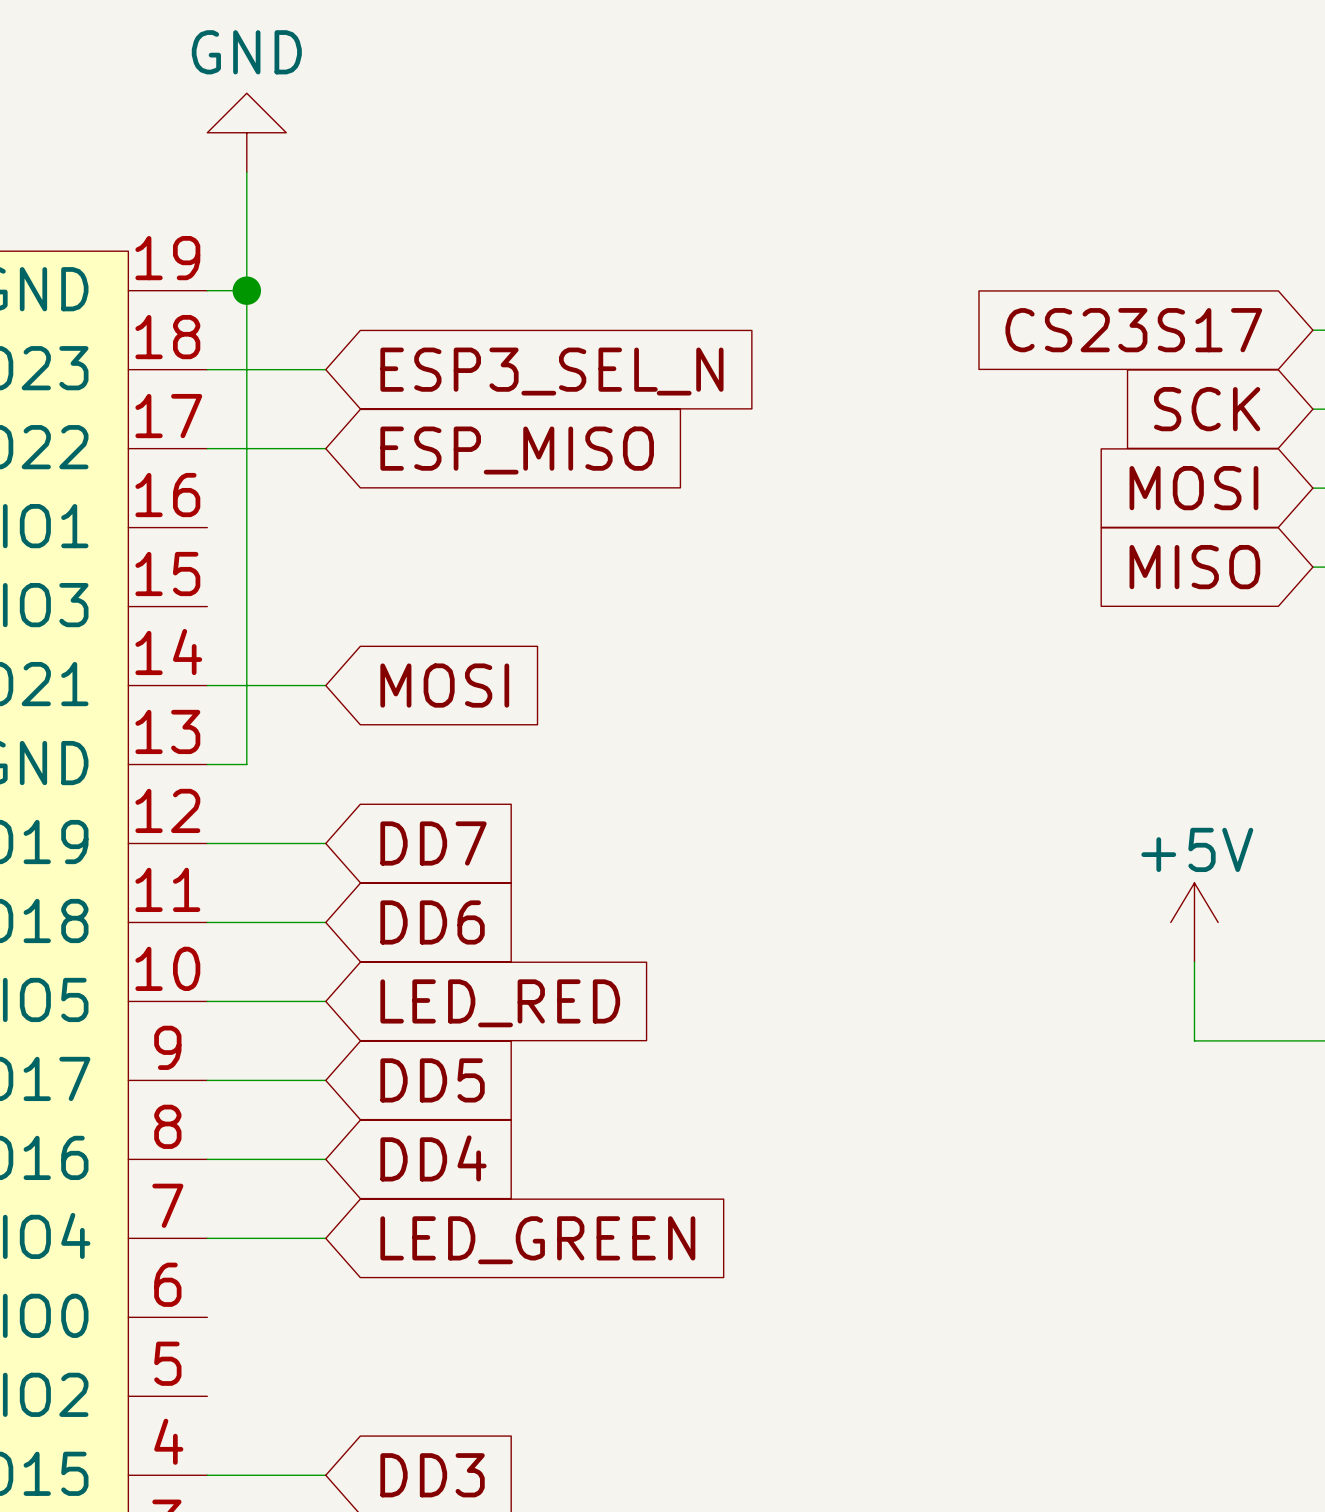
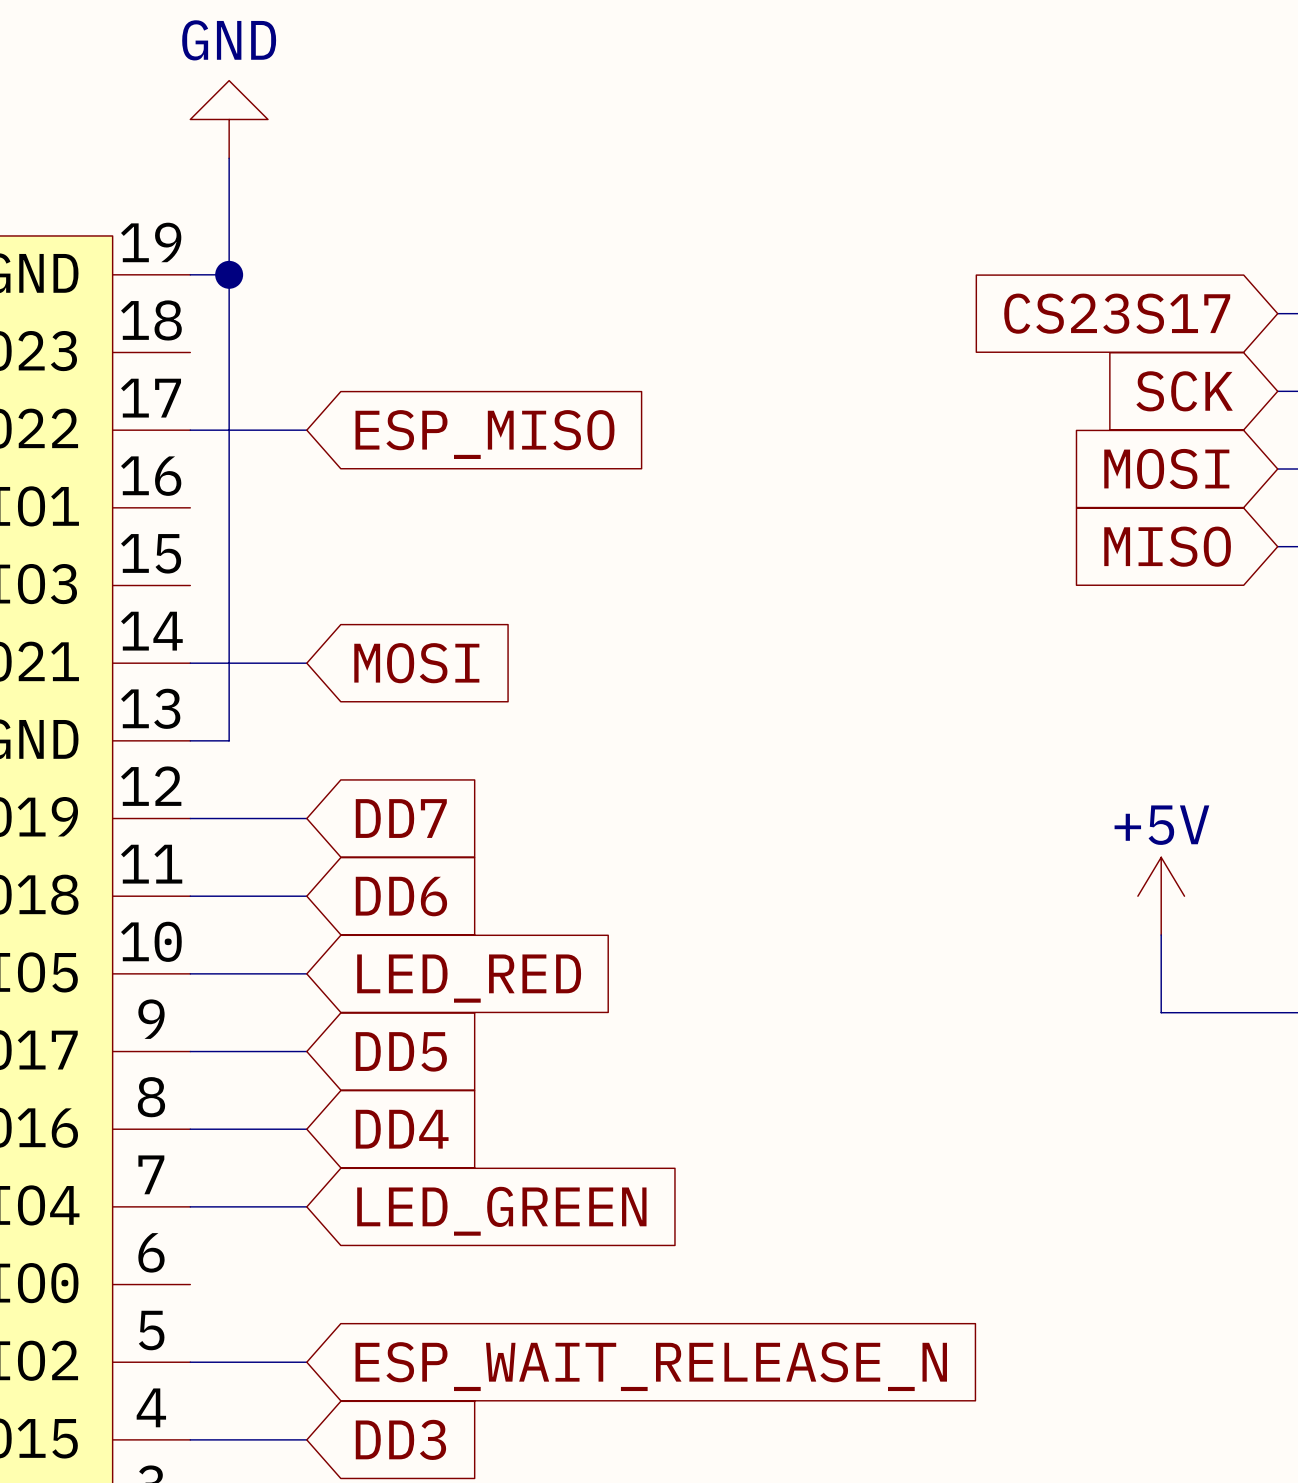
wire: (207, 369) (325, 369) -> none
global label: ESP3_SEL_N (551, 371) -> none
wire: none -> (190, 1362) (306, 1362)
global label: none -> ESP_WAIT_RELEASE_N (651, 1366)

